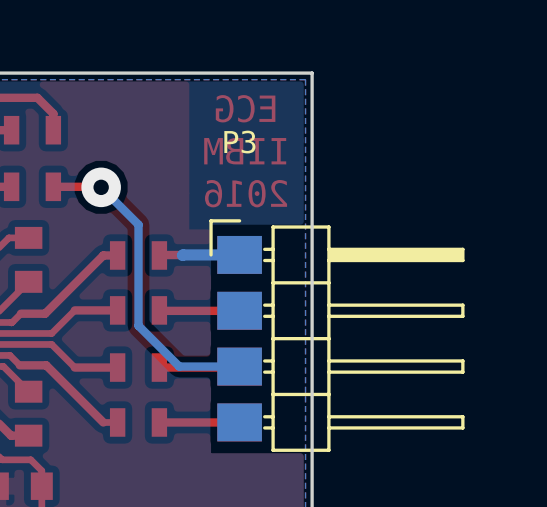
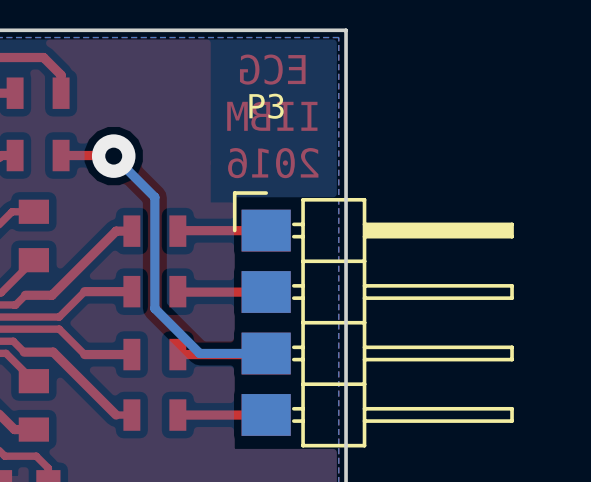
bottom track: (239, 254) (182, 255) -> none

